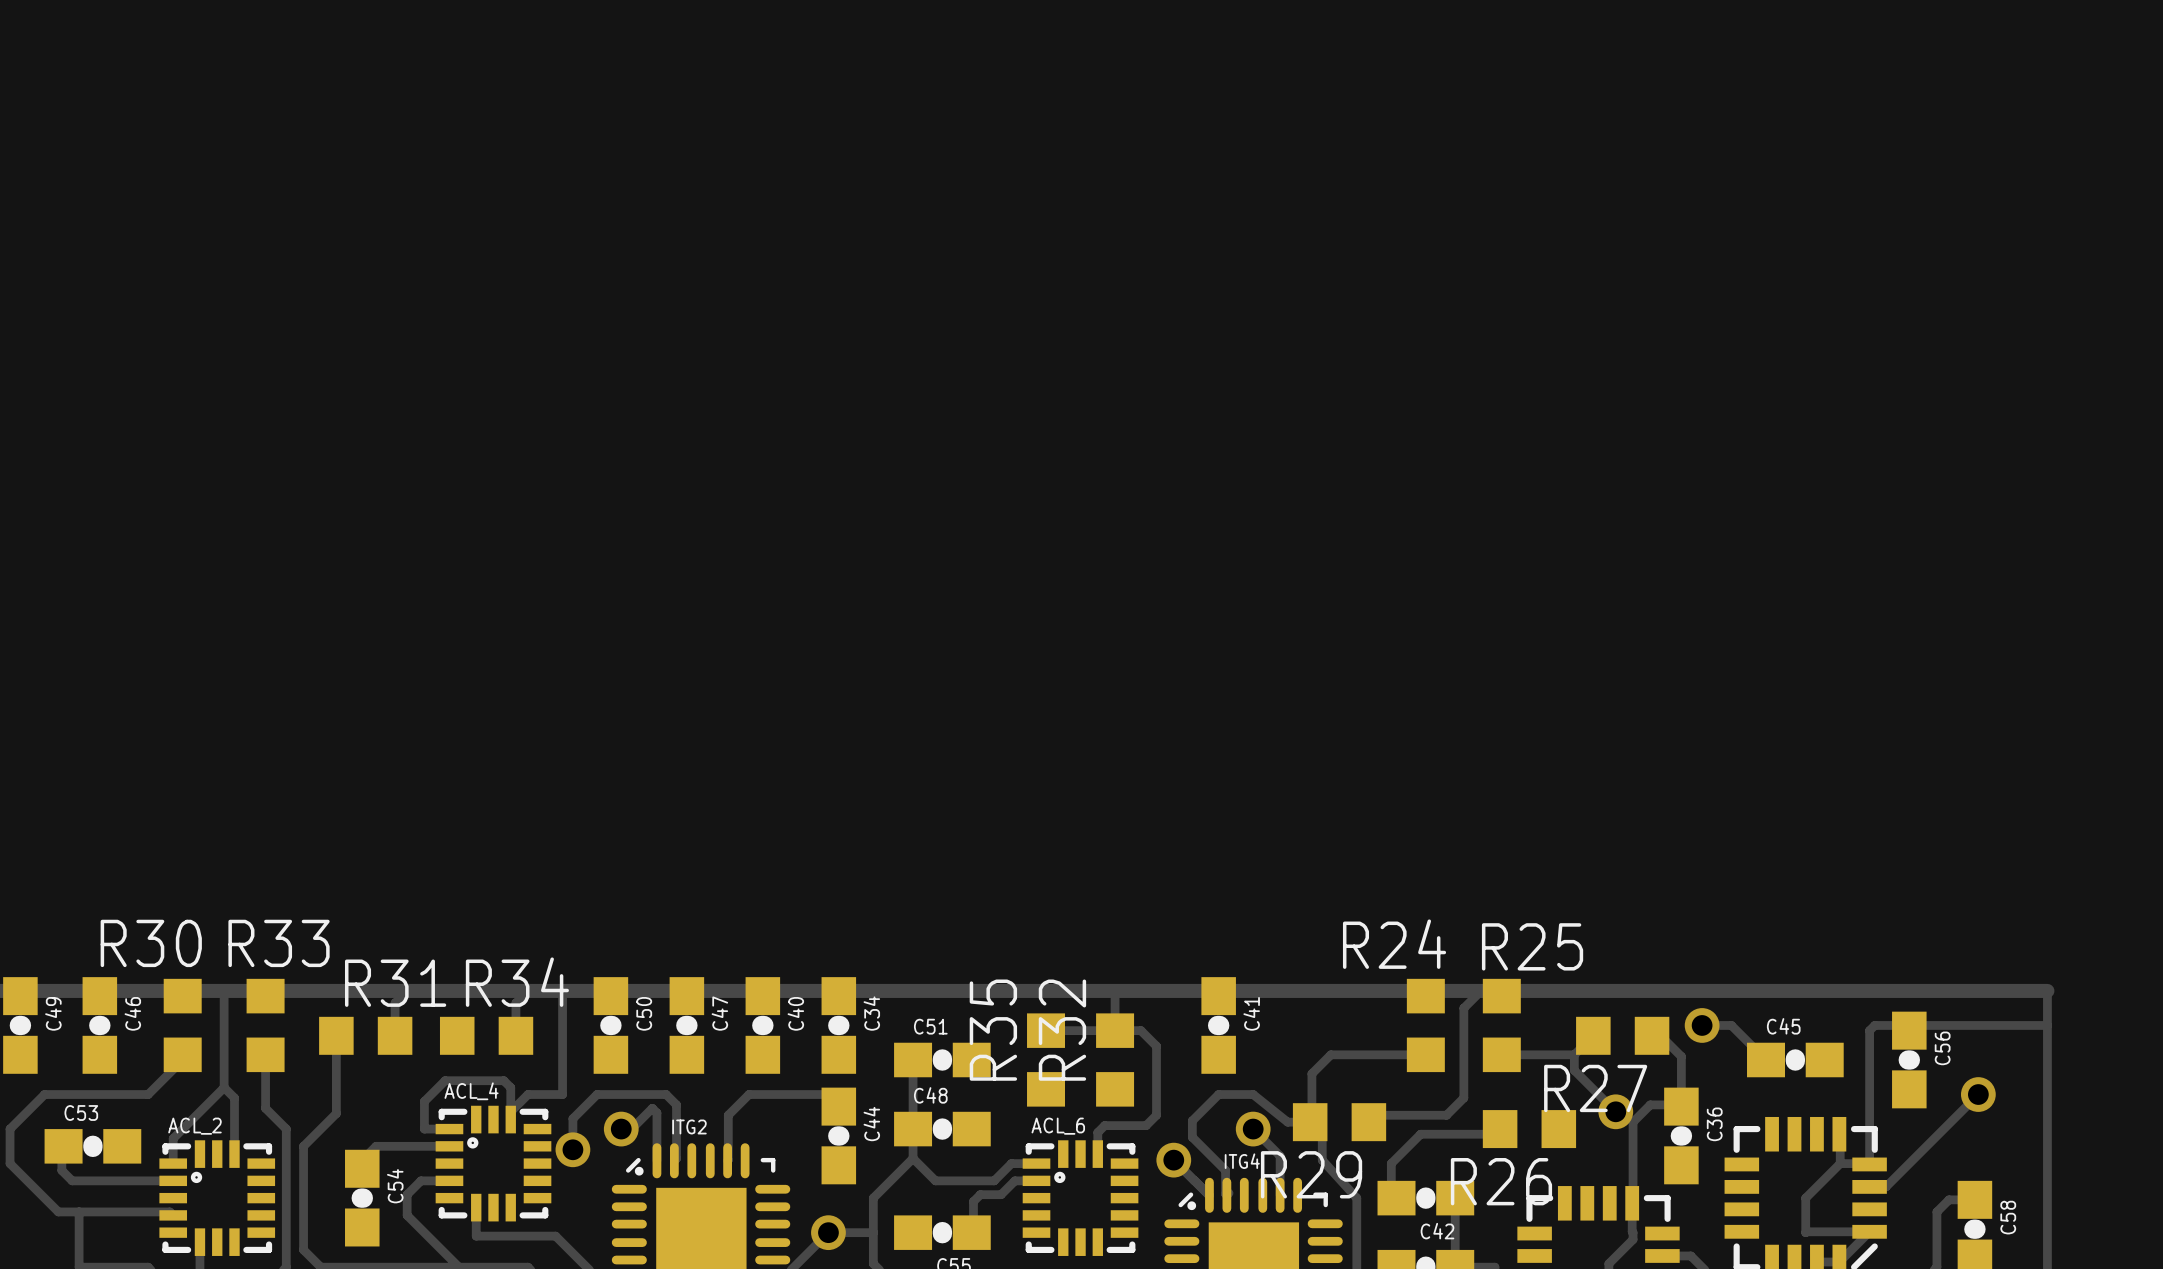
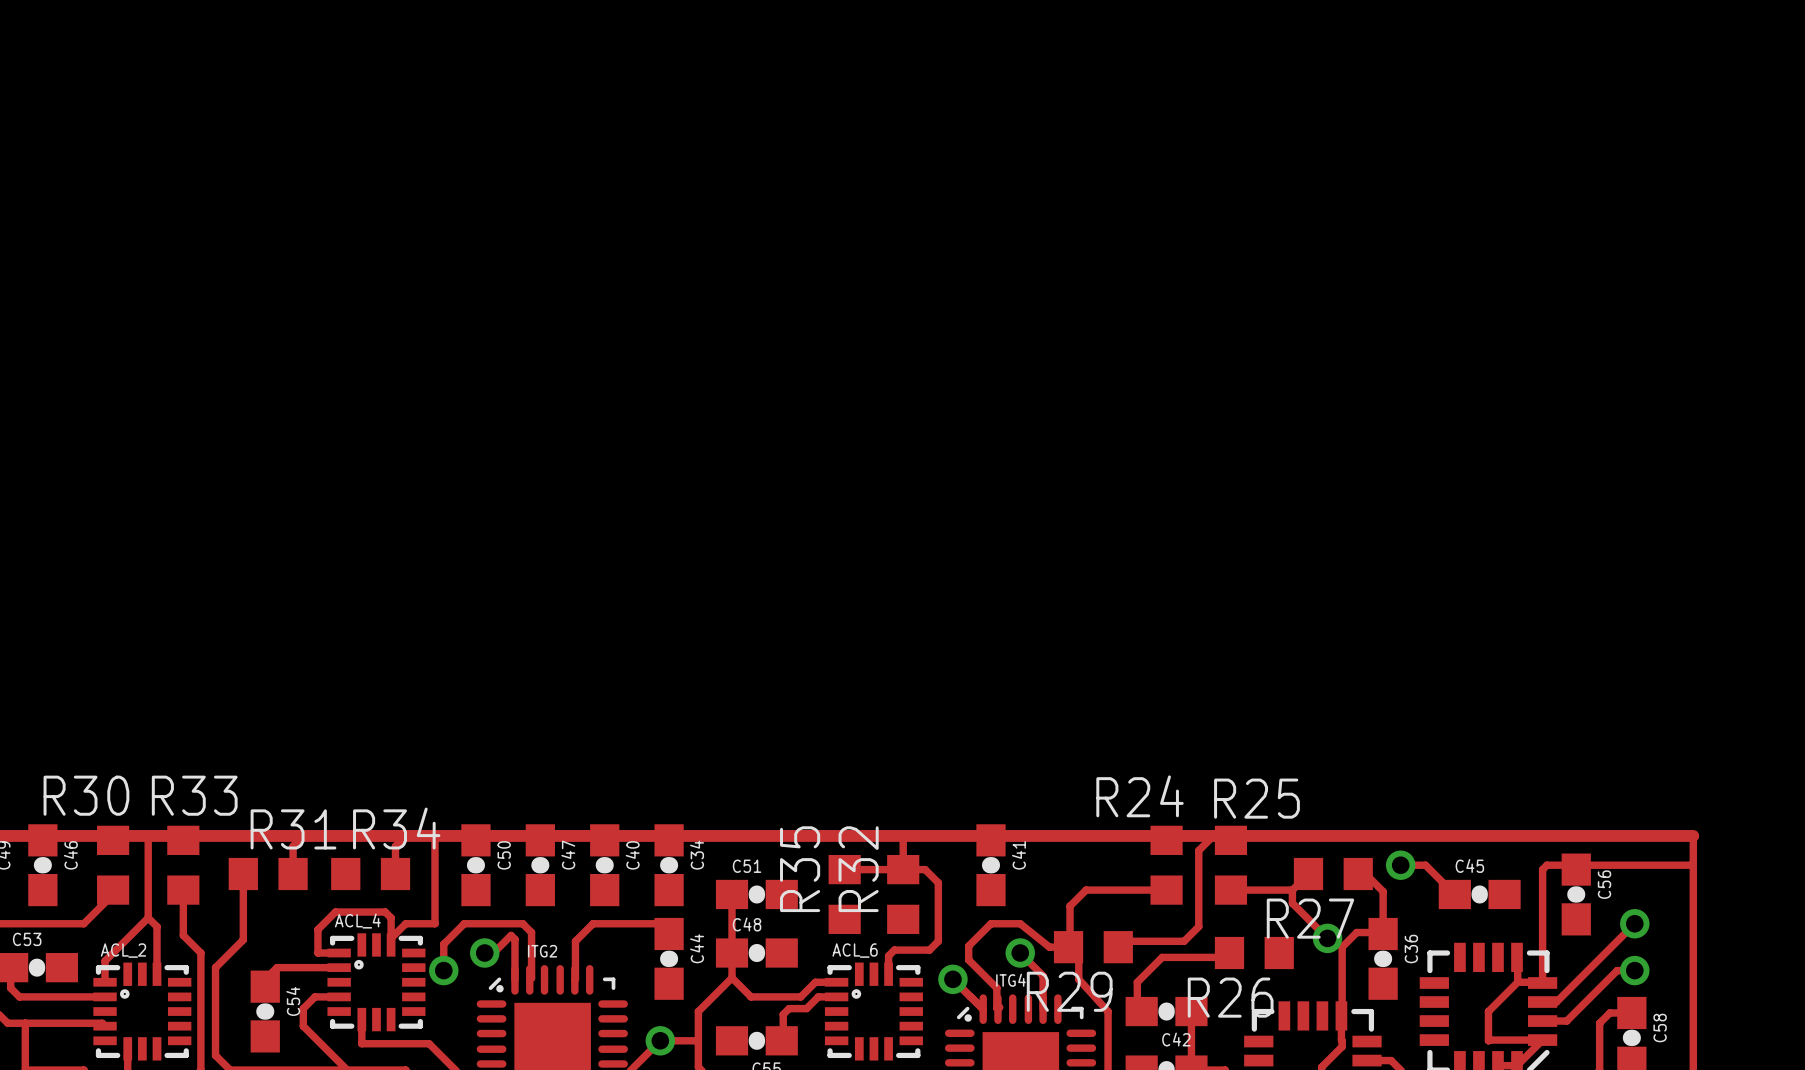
track: none -> (1634, 970) (1617, 970) (1566, 1021) (1542, 1021)
via: none -> (1634, 970)

